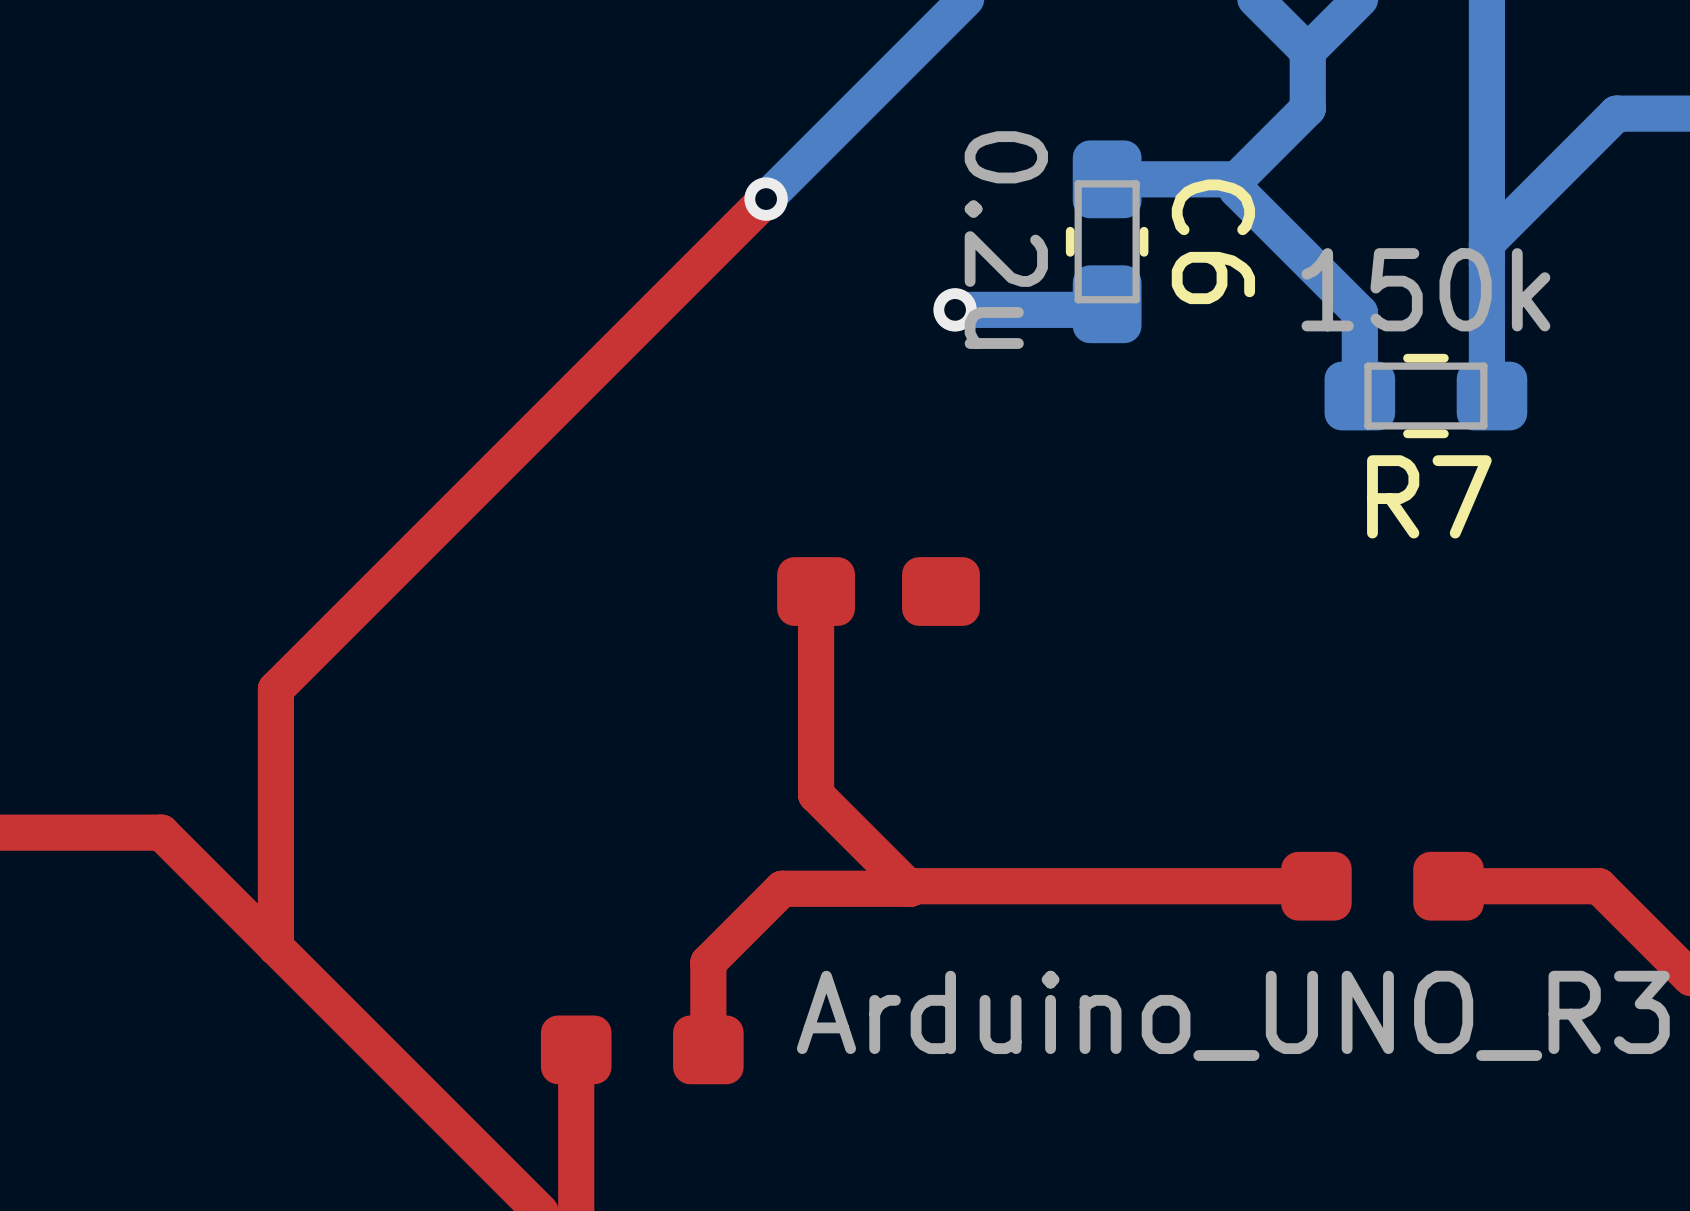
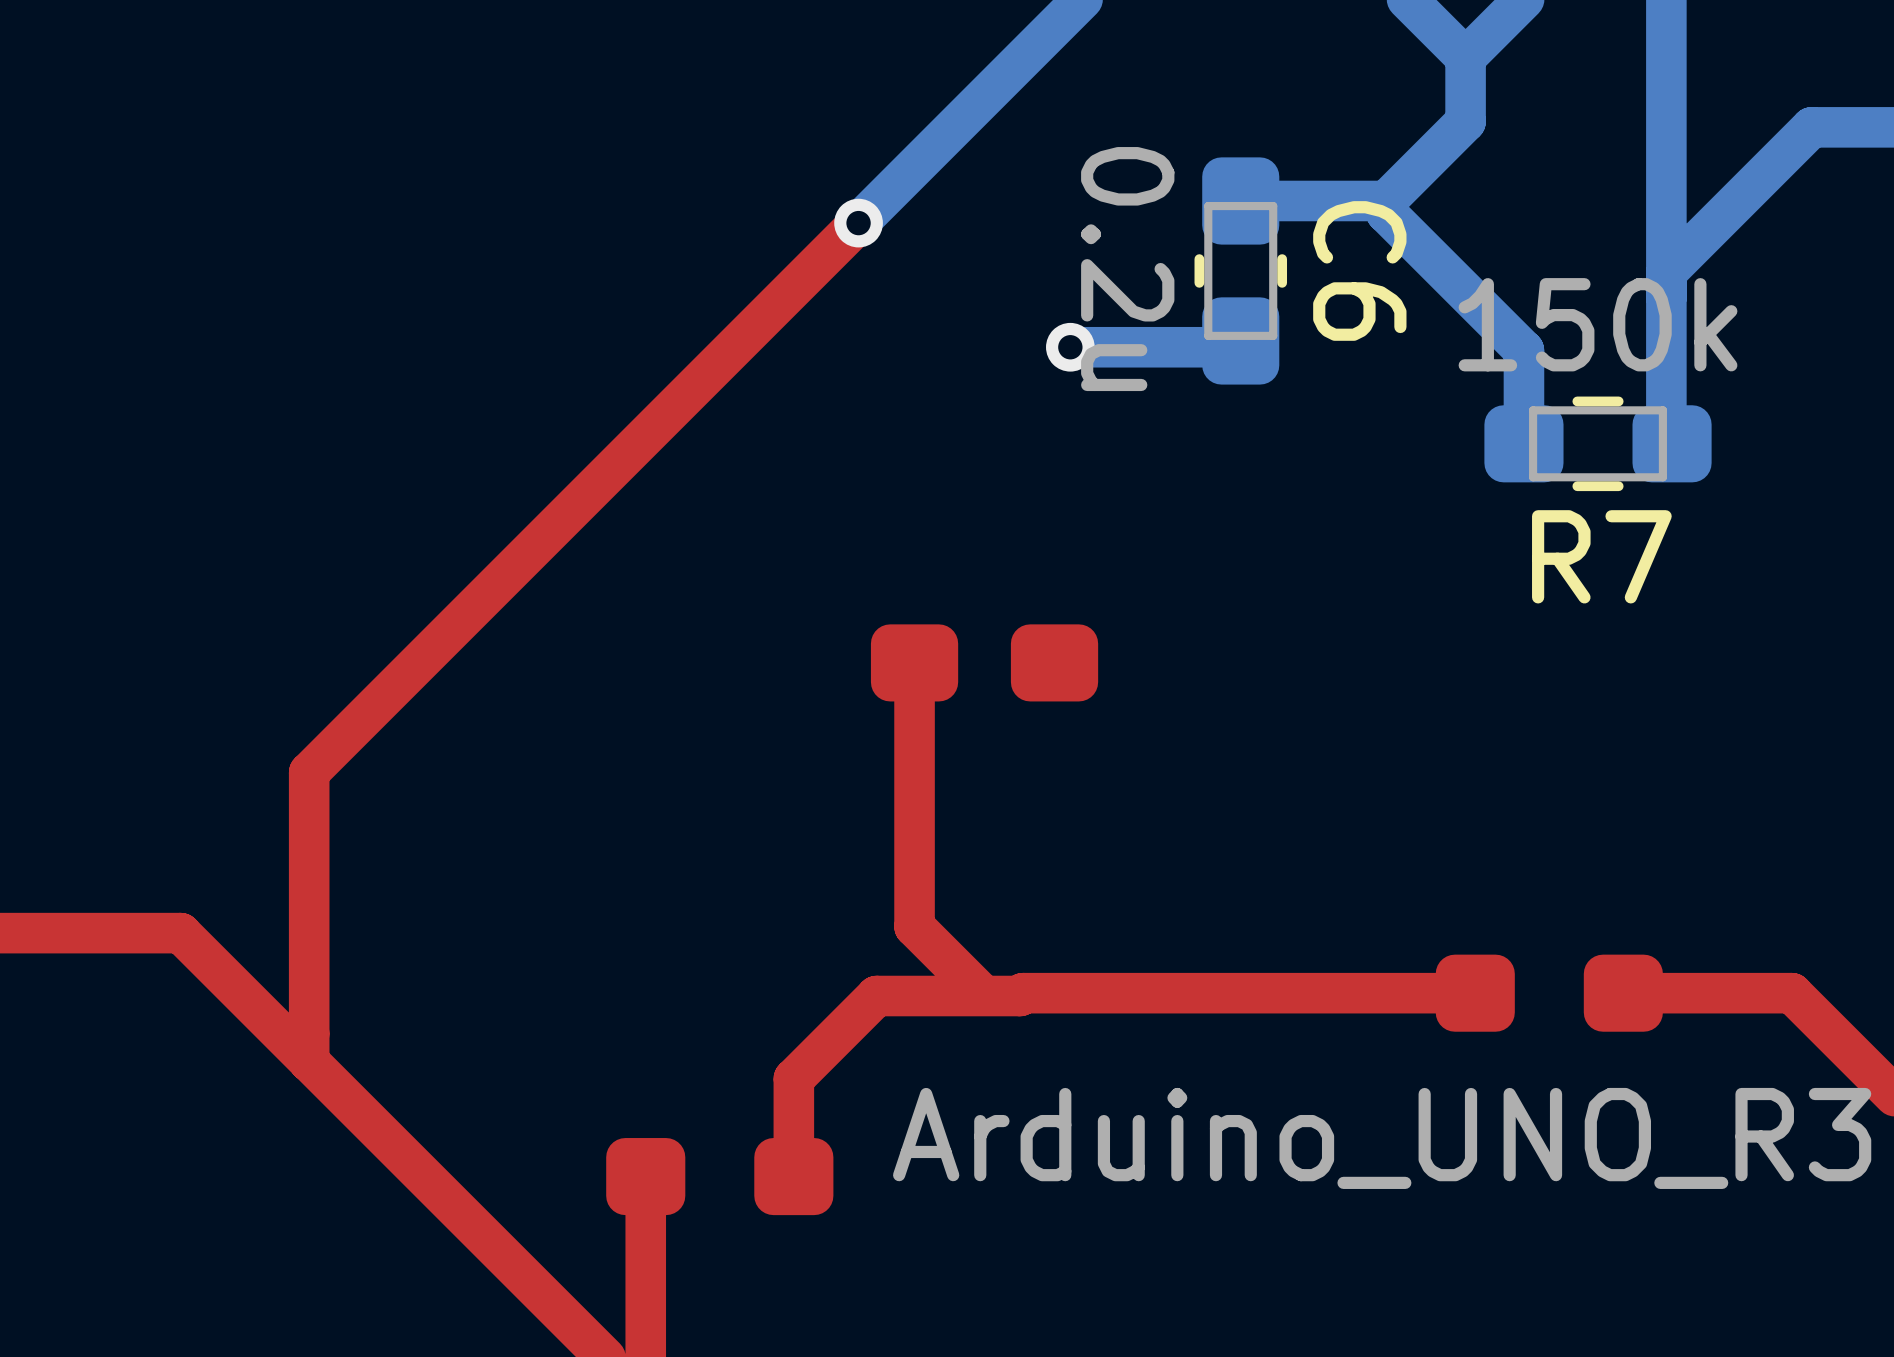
top track: (816, 794) (910, 888) -> (914, 890) (914, 926) (981, 993)

